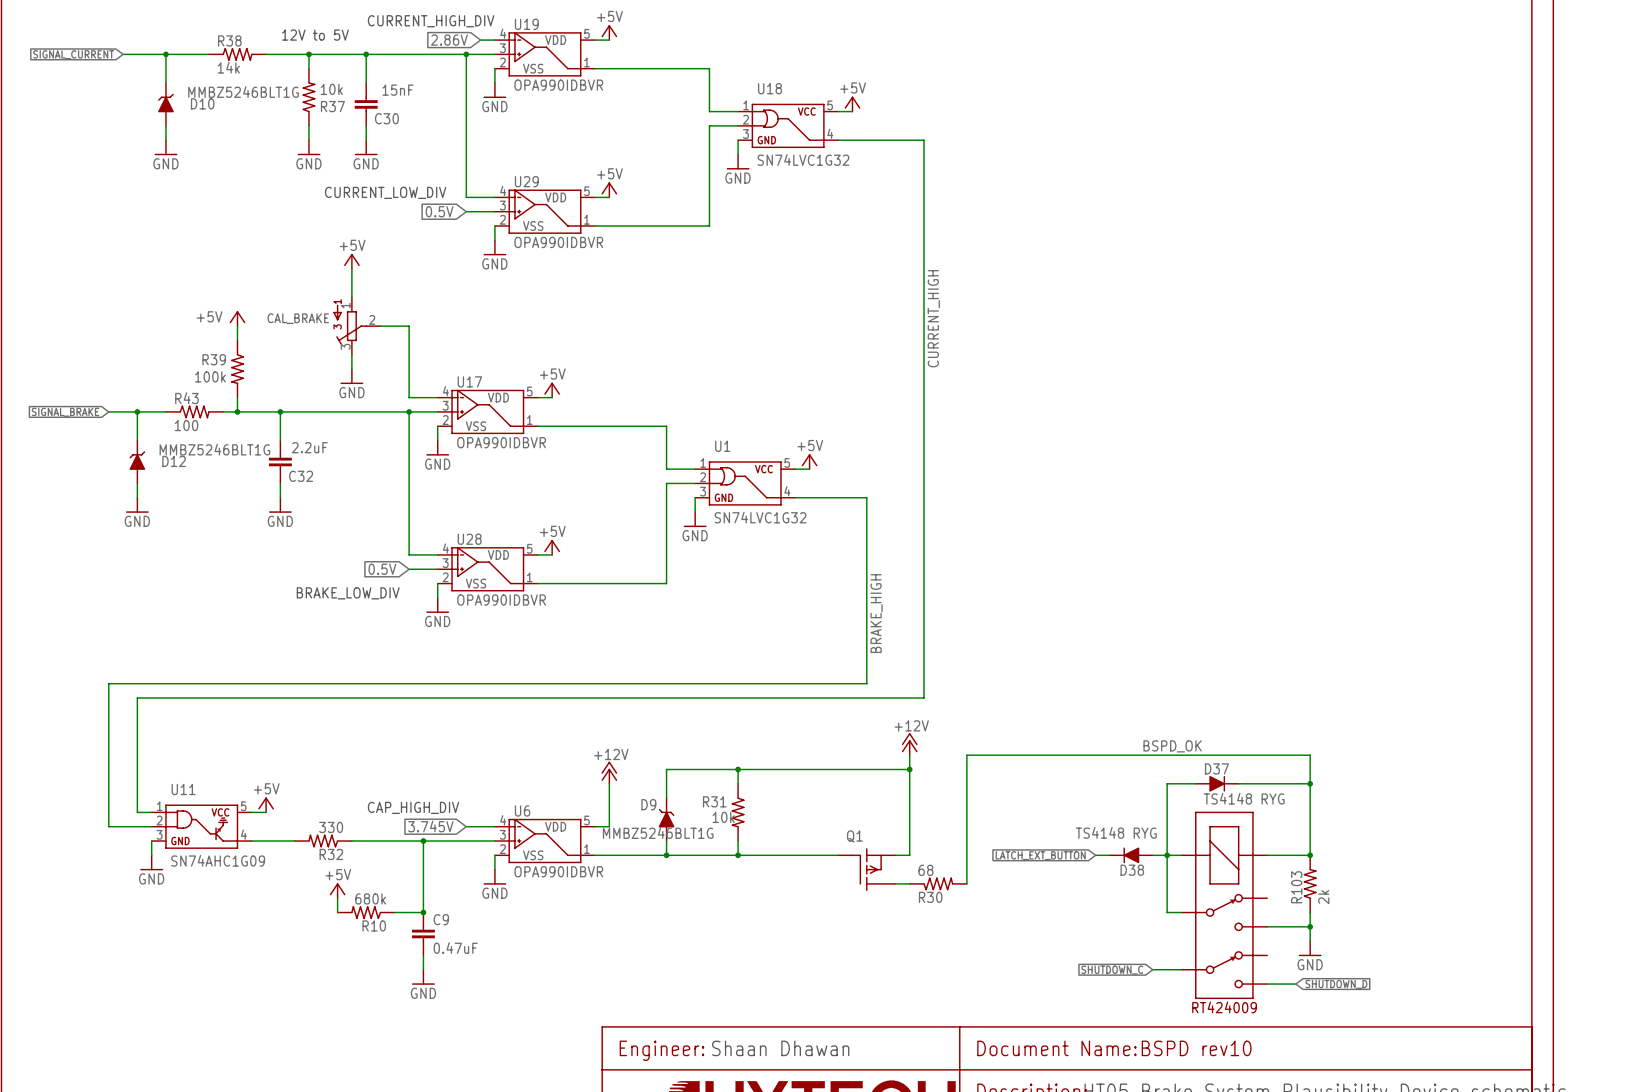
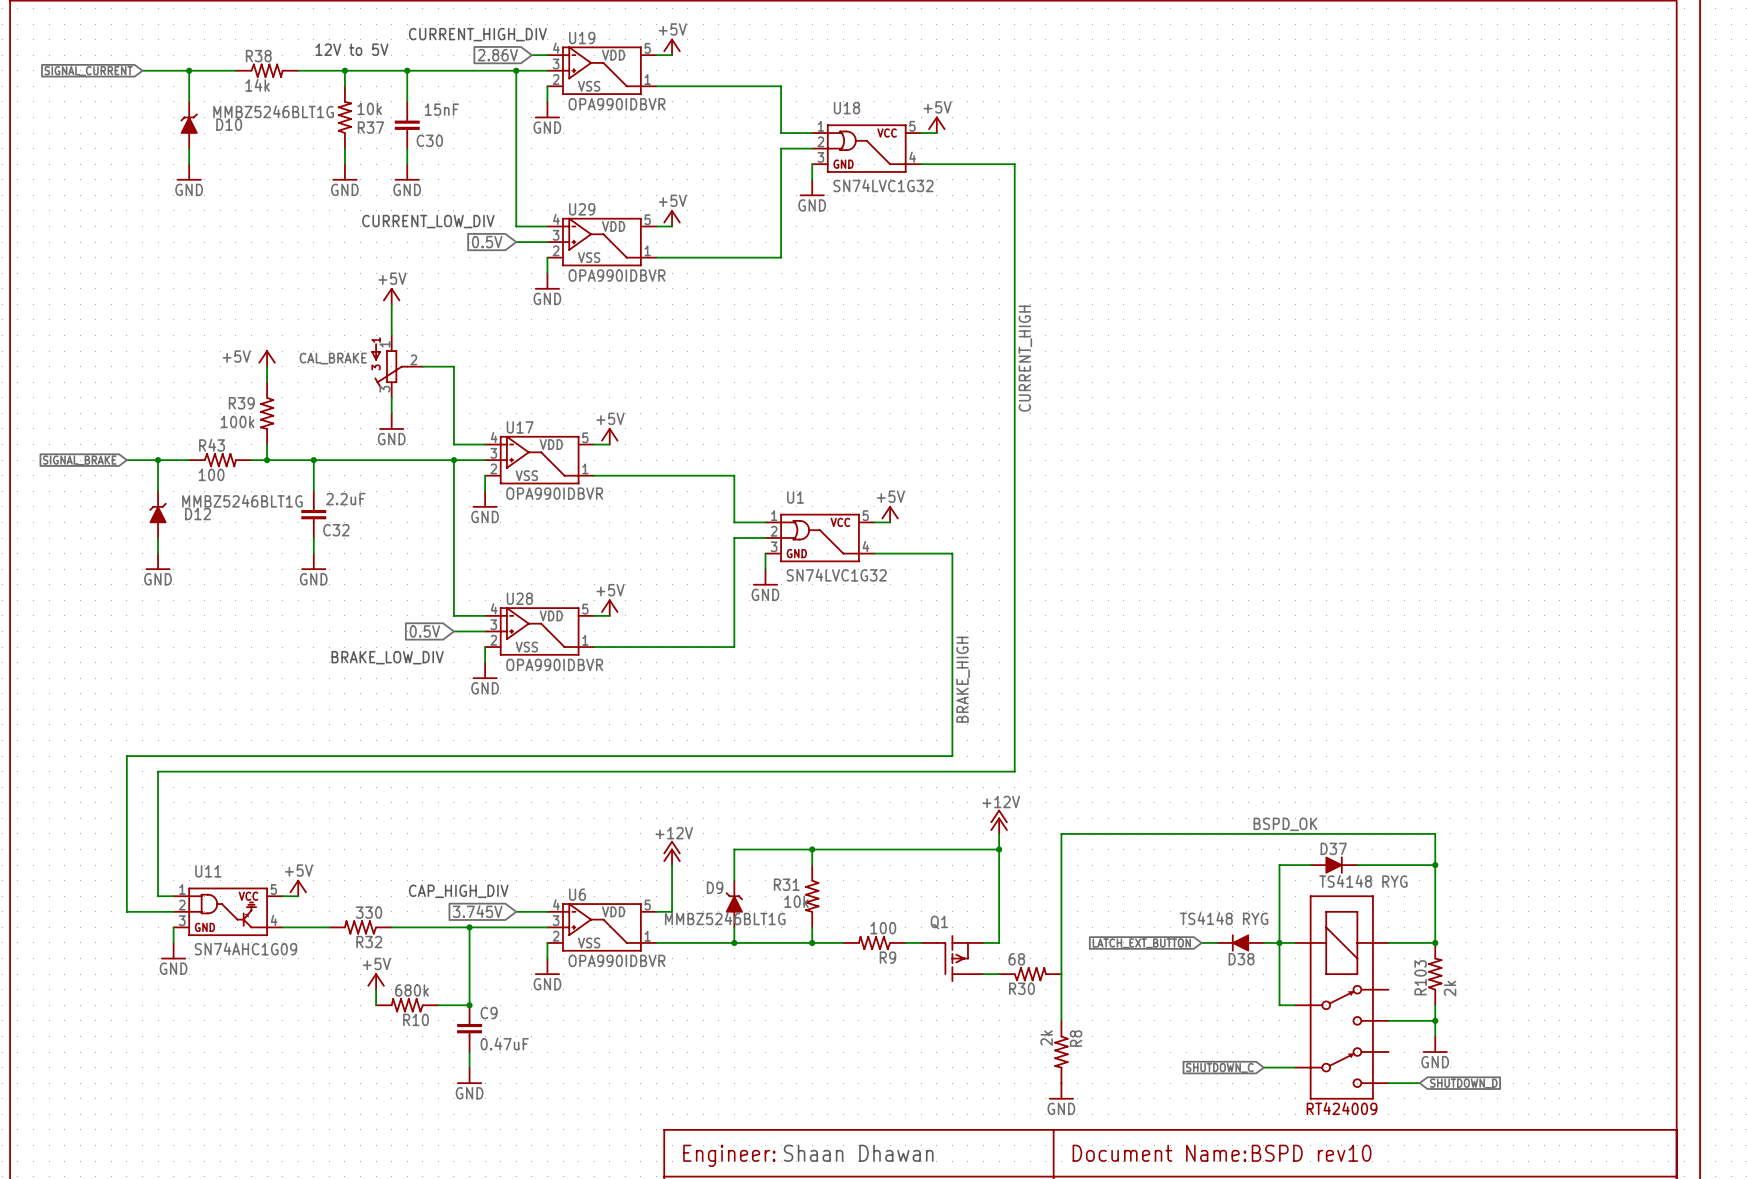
R9: none -> 100 (874, 942)
wire: none -> (1061, 974) (1061, 1020)
R8: none -> 2k (1061, 1052)
power symbol: none -> GND (1061, 1091)

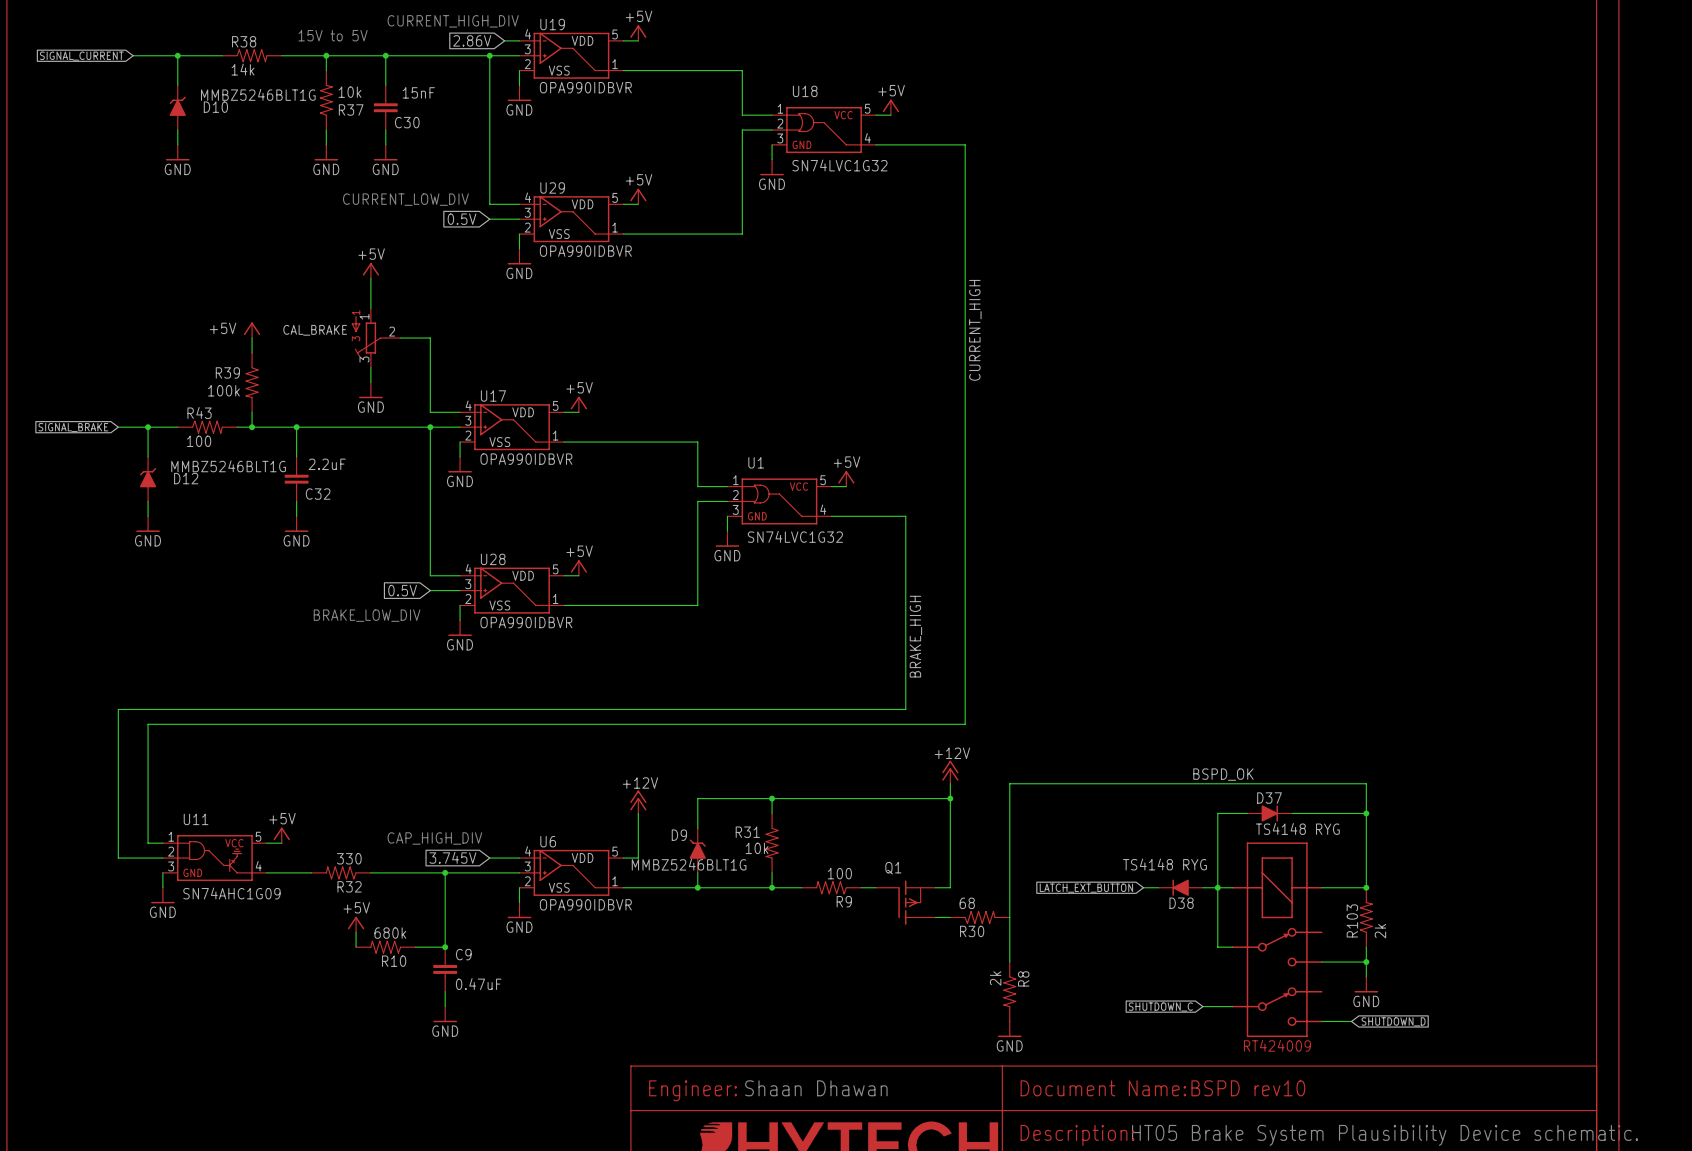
text: 12V to 5V (351, 49) -> 15V to 5V (333, 35)

